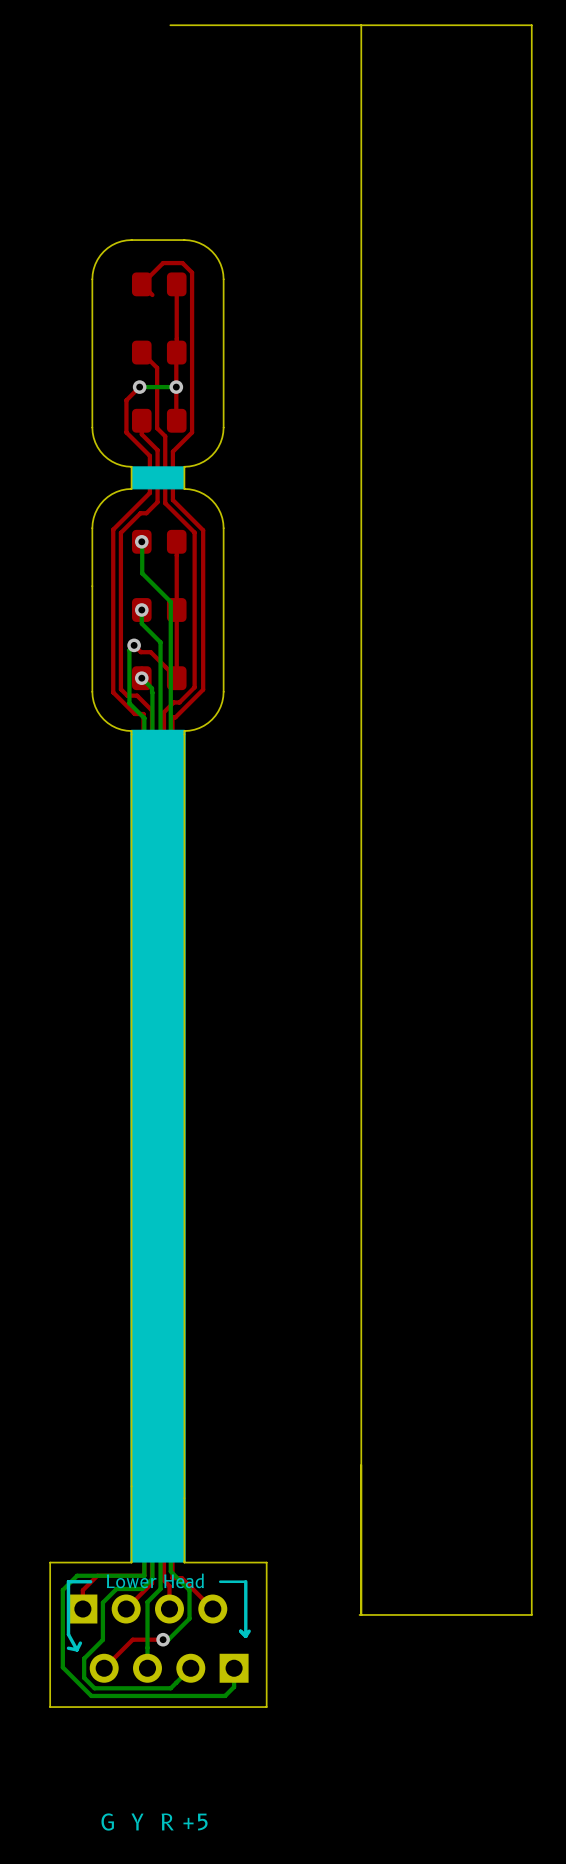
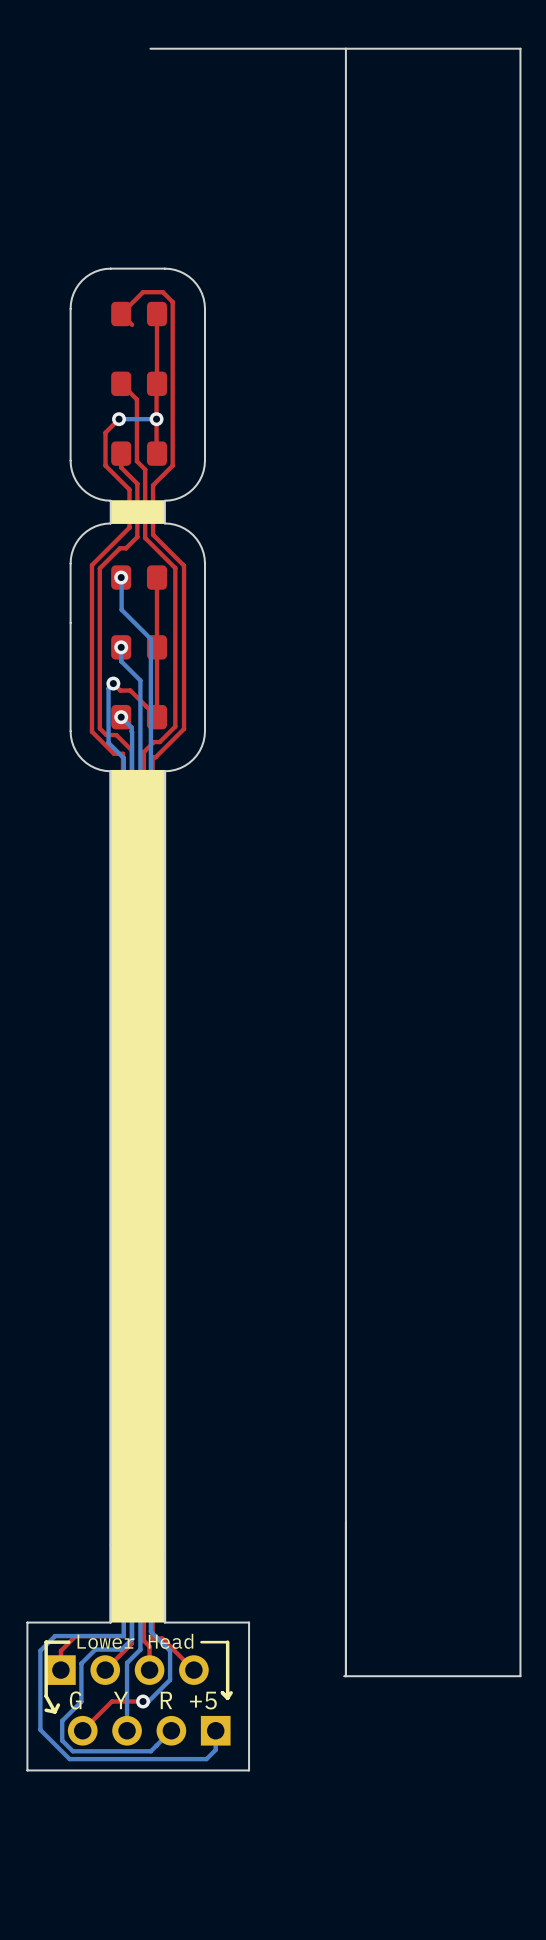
text position: G Y R +5 (154, 1822) -> G Y R +5 (143, 1700)

